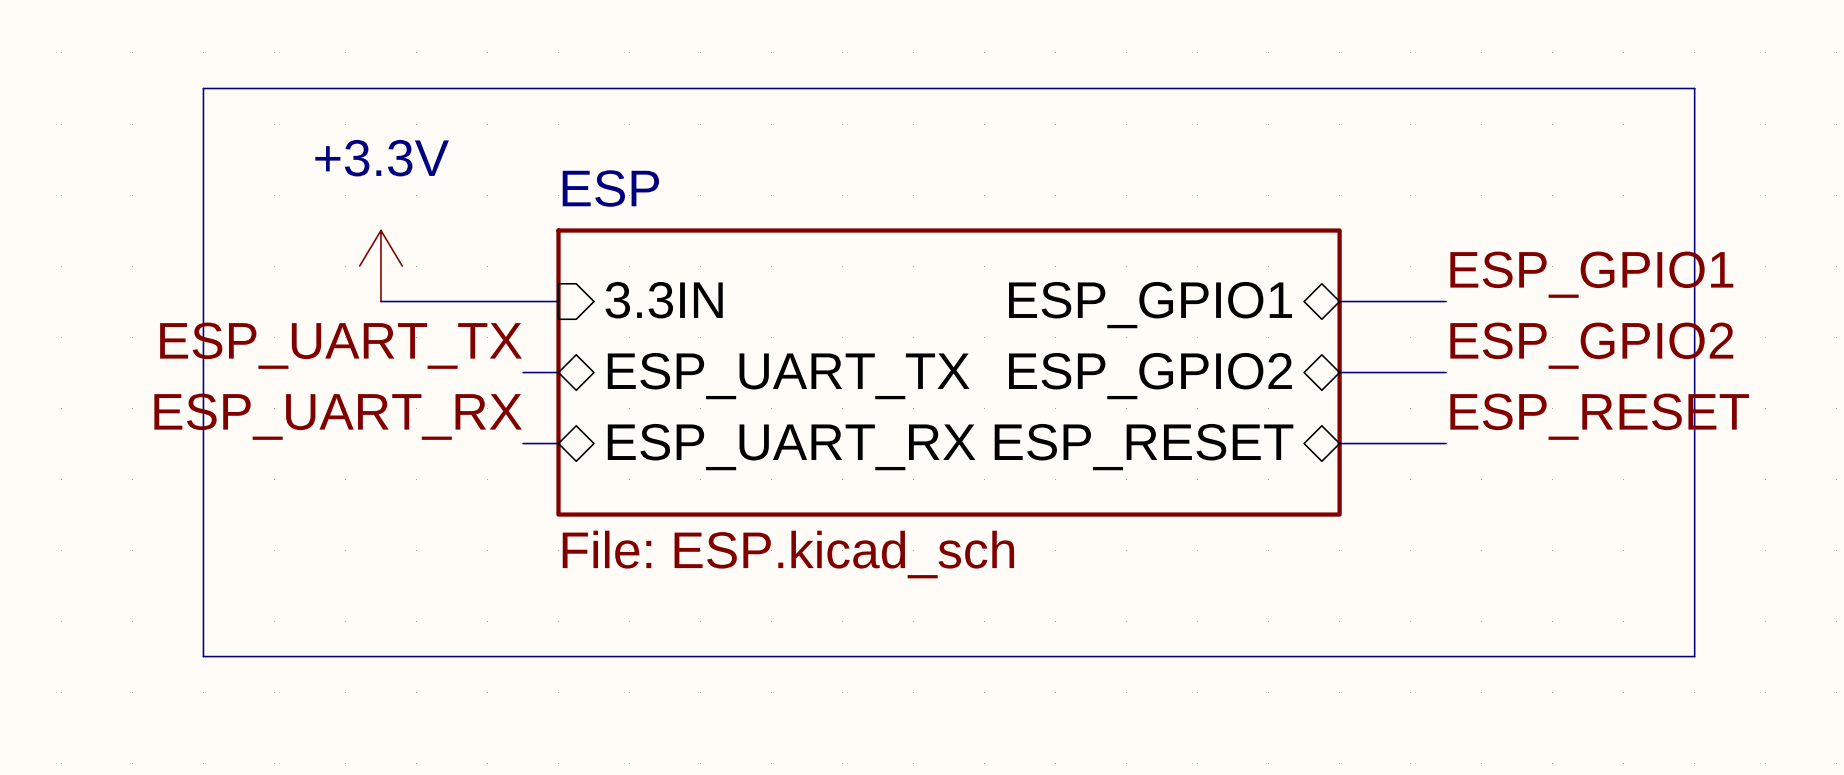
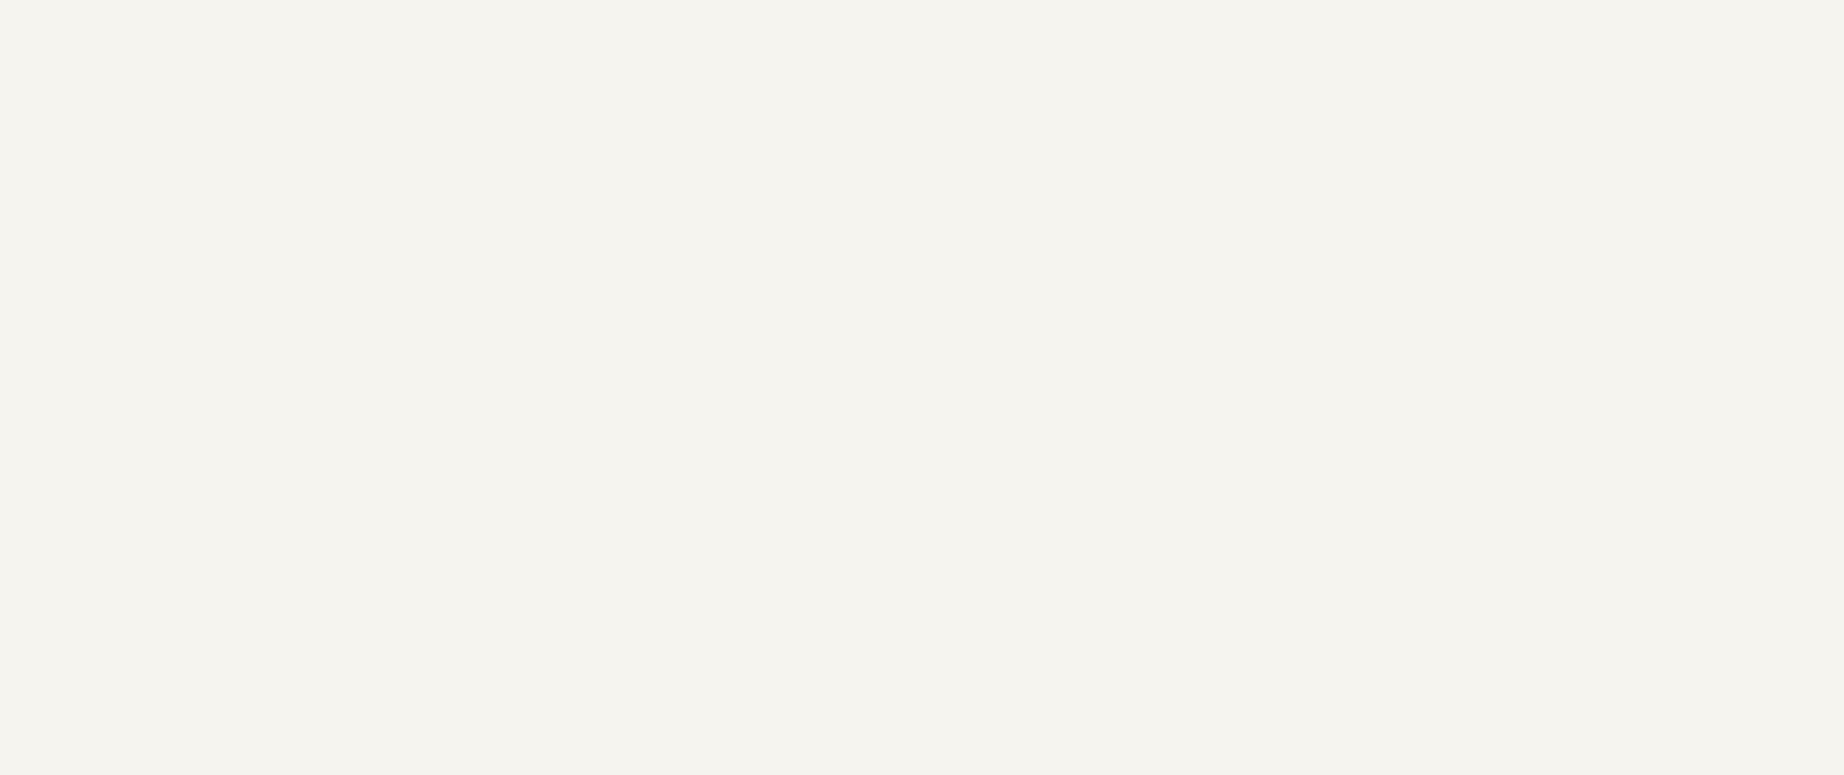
line: (203, 88) (1694, 88) (1694, 656) (203, 656) (203, 88) -> none
power symbol: +3.3V (380, 266) -> none
label: ESP_GPIO1 (1591, 274) -> none
sheet pin: 3.3IN (664, 300) -> none
wire: (380, 301) (558, 301) -> none
wire: (1339, 301) (1446, 301) -> none
sheet pin: ESP_GPIO1 (1150, 305) -> none
label: ESP_UART_TX (341, 345) -> none
label: ESP_GPIO2 (1591, 345) -> none
wire: (522, 372) (558, 372) -> none
sheet ESP: File: ESP.kicad_sch (949, 372) -> none
wire: (1339, 372) (1446, 372) -> none
sheet pin: ESP_UART_TX (788, 376) -> none
sheet pin: ESP_GPIO2 (1150, 376) -> none
label: ESP_UART_RX (338, 416) -> none
label: ESP_RESET (1599, 416) -> none
wire: (522, 443) (558, 443) -> none
wire: (1339, 443) (1446, 443) -> none
sheet pin: ESP_UART_RX (791, 447) -> none
sheet pin: ESP_RESET (1144, 447) -> none

